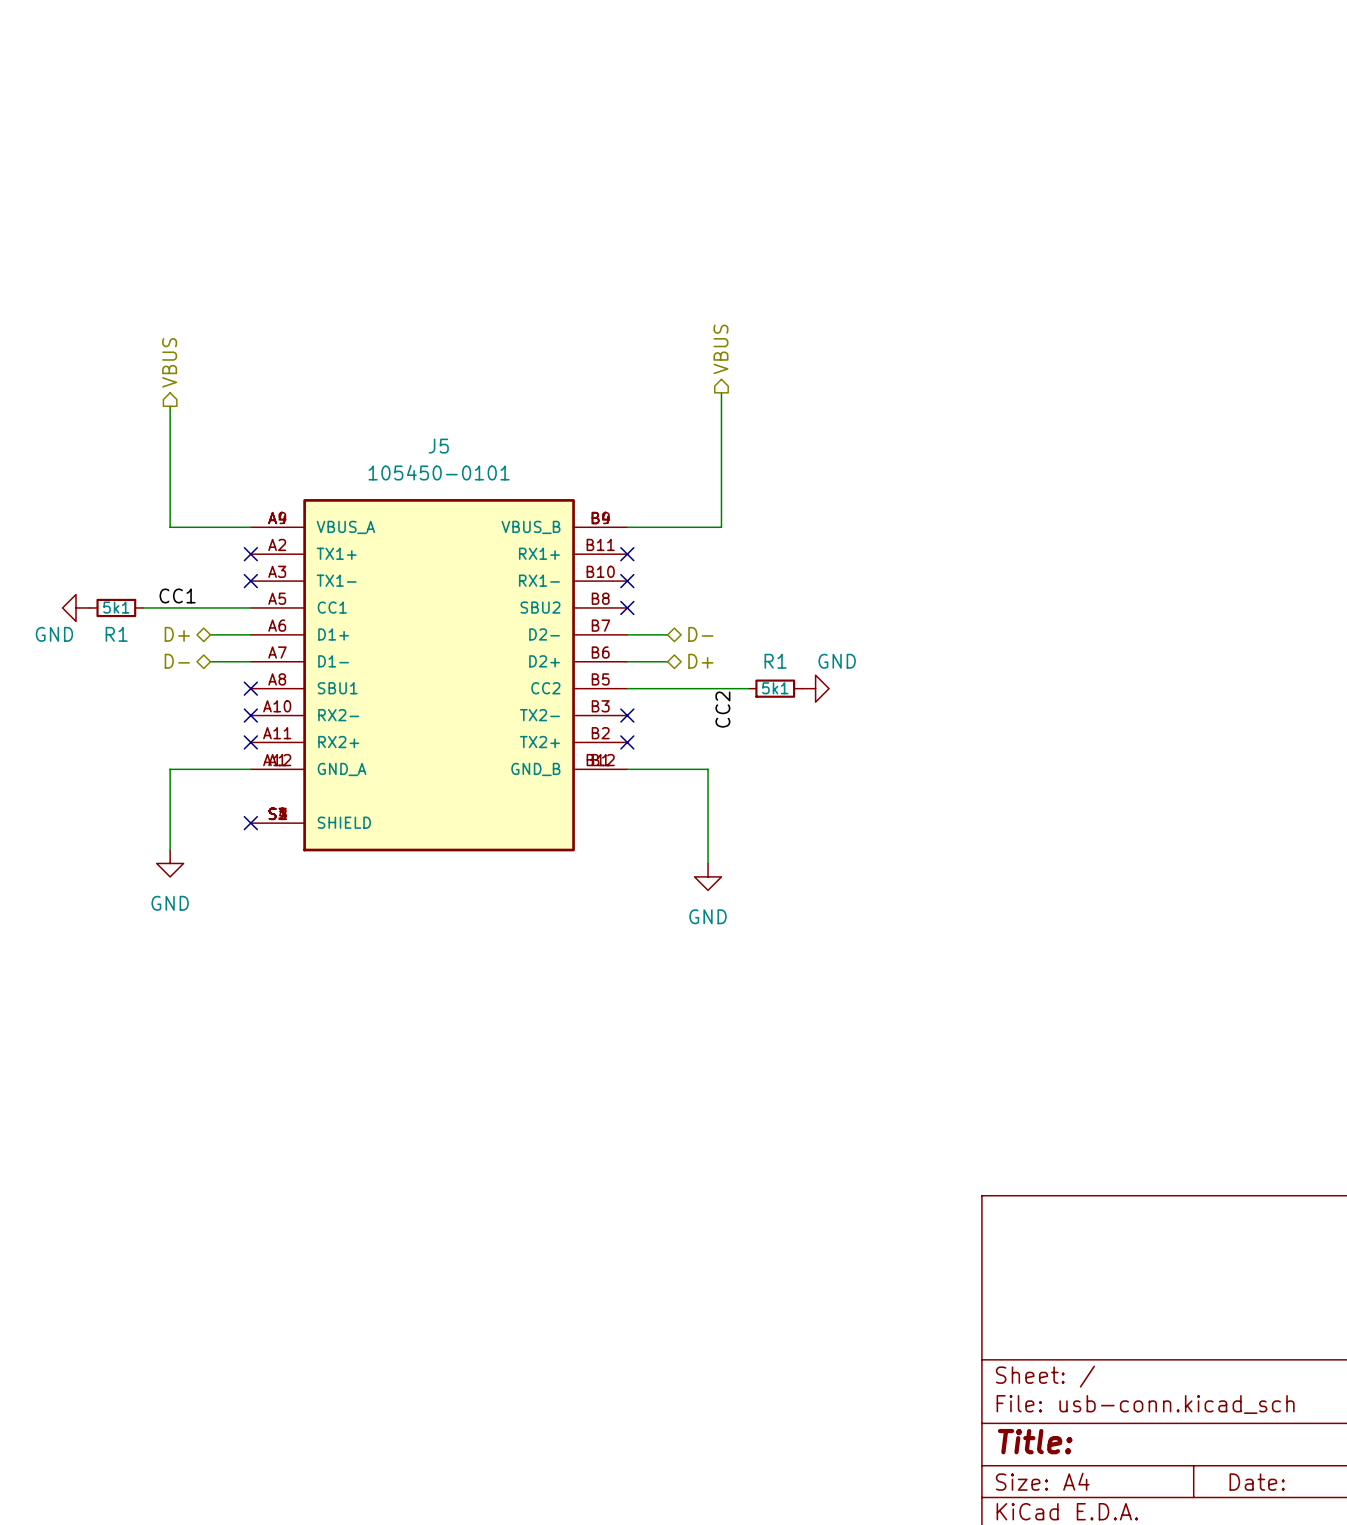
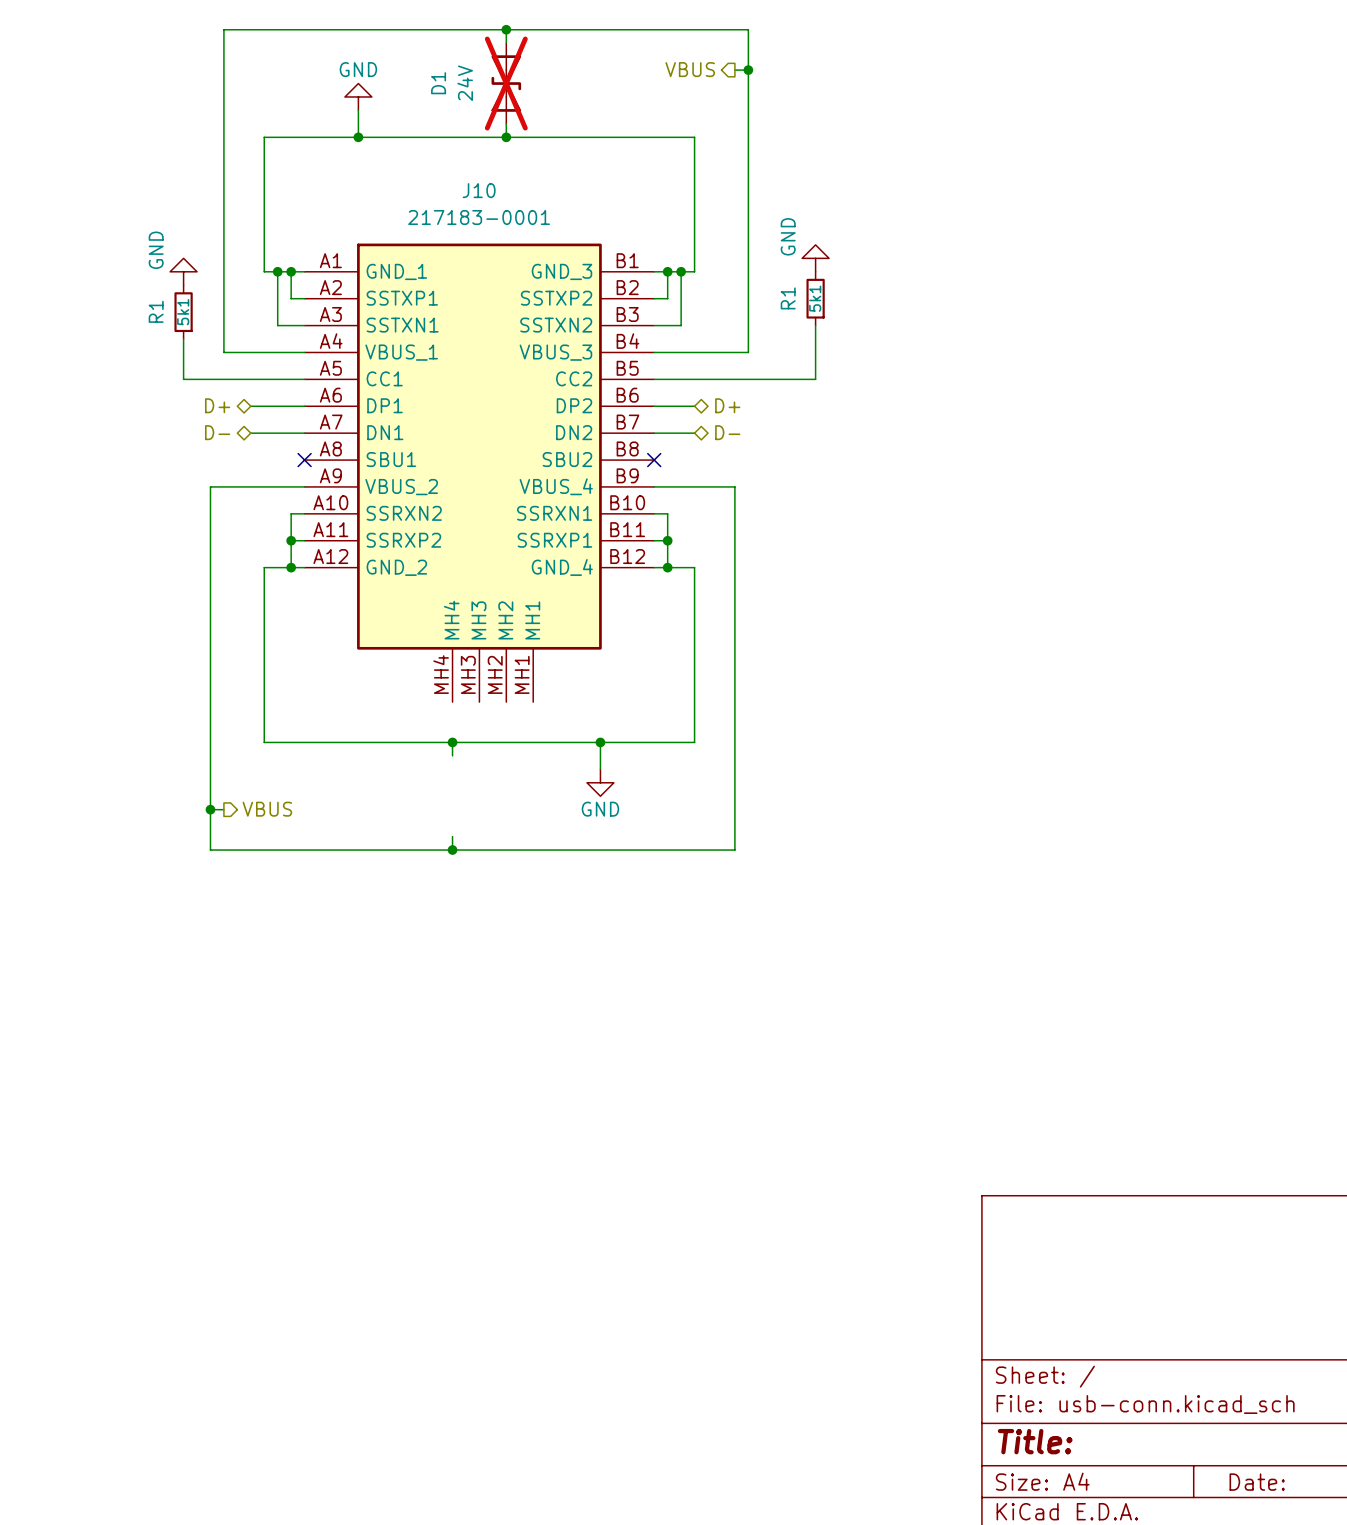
wire: none -> (506, 29) (506, 43)
junction: none -> (506, 29)
hierarchical label: none -> VBUS (690, 69)
wire: none -> (734, 70) (748, 70)
junction: none -> (748, 70)
D1: none -> 24V (506, 83)
power symbol: none -> GND (358, 96)
wire: none -> (358, 110) (358, 137)
wire: none -> (506, 123) (506, 137)
junction: none -> (358, 137)
junction: none -> (506, 137)
power symbol: none -> GND (815, 258)
power symbol: none -> GND (183, 271)
wire: none -> (277, 271) (277, 325) (304, 325)
junction: none -> (277, 271)
wire: none -> (291, 271) (291, 298) (304, 298)
junction: none -> (291, 271)
wire: none -> (304, 271) (264, 271) (264, 137) (694, 137) (694, 271) (654, 271)
wire: none -> (667, 271) (667, 298) (654, 298)
junction: none -> (667, 271)
wire: none -> (681, 271) (681, 325) (654, 325)
junction: none -> (681, 271)
R1: none -> 5k1 (815, 298)
R1: none -> 5k1 (183, 312)
wire: none -> (815, 325) (815, 379) (654, 379)
wire: none -> (183, 339) (183, 379) (304, 379)
hierarchical label: VBUS (720, 349) -> none
wire: none -> (304, 352) (223, 352) (223, 29) (748, 29) (748, 352) (654, 352)
hierarchical label: VBUS (169, 362) -> none
wire: (721, 392) (721, 527) (627, 527) -> none
wire: (170, 406) (170, 527) (250, 527) -> none
wire: none -> (250, 406) (304, 406)
wire: none -> (250, 433) (304, 433)
no-connect mark: none -> (304, 460)
no-connect mark: none -> (654, 460)
J10: none -> 217183-0001 (479, 472)
wire: none -> (304, 486) (210, 486) (210, 850) (734, 850) (734, 486) (654, 486)
wire: none -> (304, 513) (291, 513) (291, 567)
wire: none -> (654, 513) (667, 513) (667, 567)
wire: none -> (291, 540) (304, 540)
junction: none -> (291, 540)
wire: none -> (654, 540) (667, 540)
junction: none -> (667, 540)
no-connect mark: (250, 554) -> none
no-connect mark: (627, 554) -> none
junction: none -> (291, 567)
wire: none -> (304, 567) (264, 567) (264, 742) (694, 742) (694, 567) (654, 567)
junction: none -> (667, 567)
no-connect mark: (250, 581) -> none
no-connect mark: (627, 581) -> none
label: CC1 (177, 595) -> none
power symbol: GND (76, 607) -> none
R1: 5k1 (116, 607) -> none
wire: (143, 607) (250, 607) -> none
no-connect mark: (627, 607) -> none
hierarchical label position: D+ (177, 634) -> D+ (217, 405)
wire: (210, 634) (250, 634) -> none
wire: (627, 634) (667, 634) -> (654, 406) (694, 406)
hierarchical label position: D- (700, 634) -> D- (727, 432)
hierarchical label position: D- (177, 661) -> D- (217, 432)
wire: (210, 661) (250, 661) -> none
wire: (627, 661) (667, 661) -> (654, 433) (694, 433)
hierarchical label position: D+ (700, 661) -> D+ (727, 405)
J5: 105450-0101 (439, 675) -> none
no-connect mark: (250, 688) -> none
wire: (627, 688) (748, 688) -> none
R1: 5k1 (775, 688) -> none
power symbol: GND (815, 688) -> none
label: CC2 (722, 709) -> none
no-connect mark: (250, 715) -> none
no-connect mark: (627, 715) -> none
no-connect mark: (250, 742) -> none
junction: none -> (452, 742)
junction: none -> (600, 742)
no-connect mark: (627, 742) -> none
wire: (250, 769) (170, 769) (170, 850) -> none
wire: (627, 769) (708, 769) (708, 863) -> none
power symbol: none -> GND (600, 782)
wire: none -> (210, 809) (223, 809)
junction: none -> (210, 809)
hierarchical label: none -> VBUS (267, 809)
no-connect mark: (250, 823) -> none
junction: none -> (452, 850)
power symbol: GND (170, 863) -> none
power symbol: GND (708, 876) -> none

